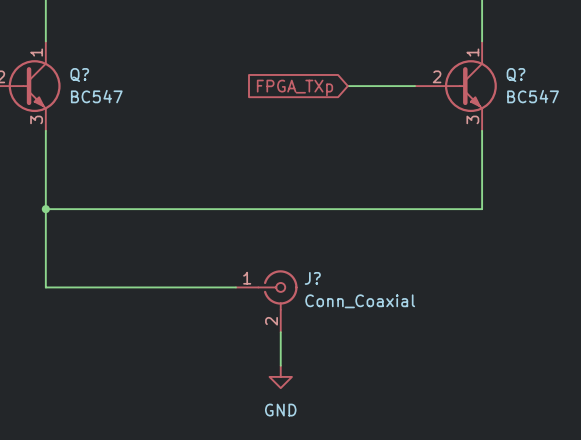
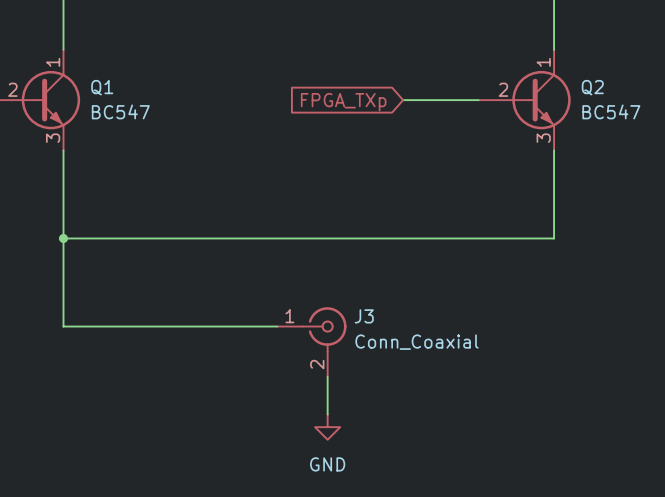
Q? name: Q? (79, 75) -> Q1 (102, 87)
Q? name: Q? (516, 75) -> Q2 (592, 87)
J? name: J? (312, 278) -> J3 (364, 316)

